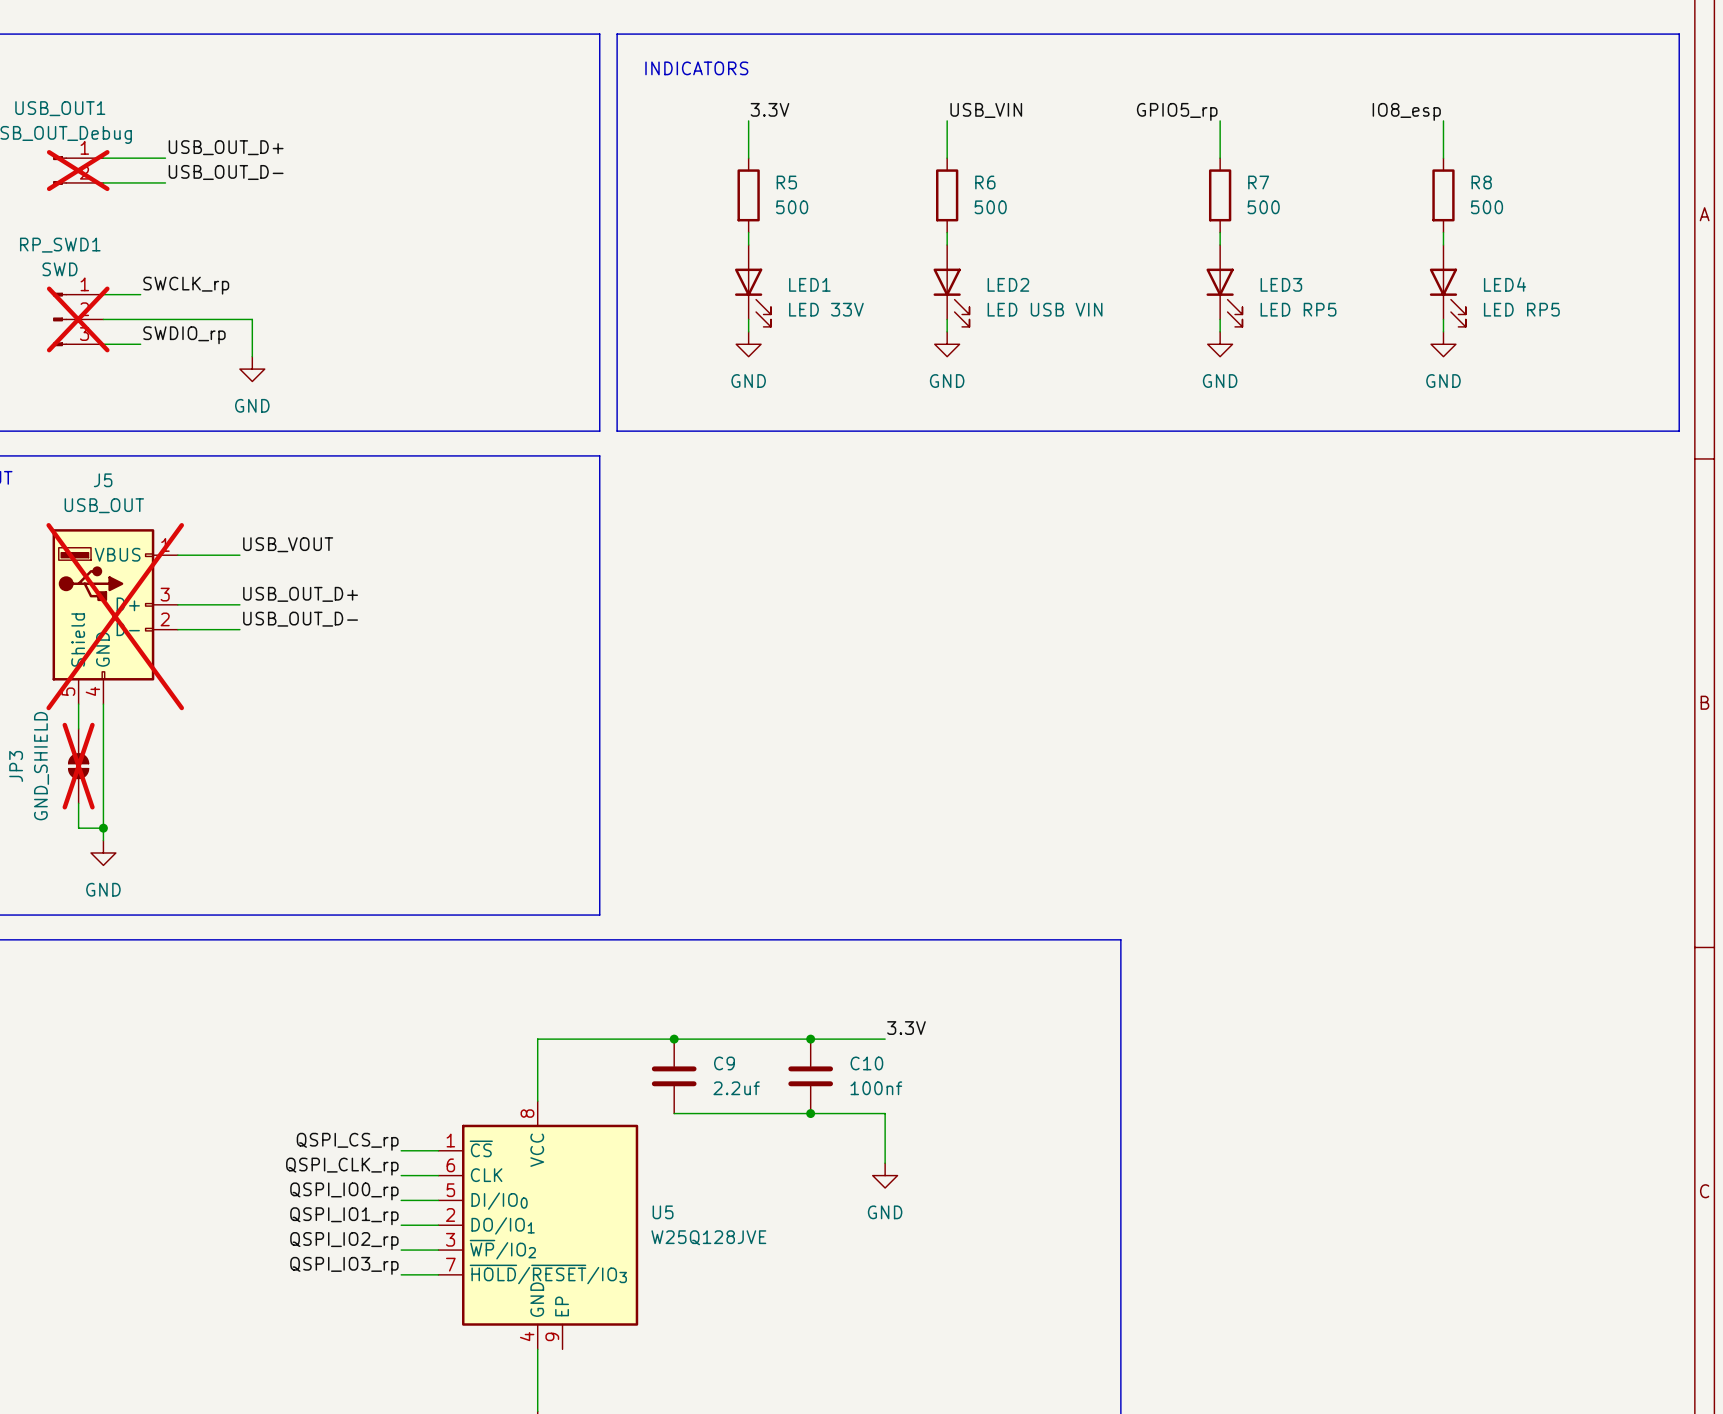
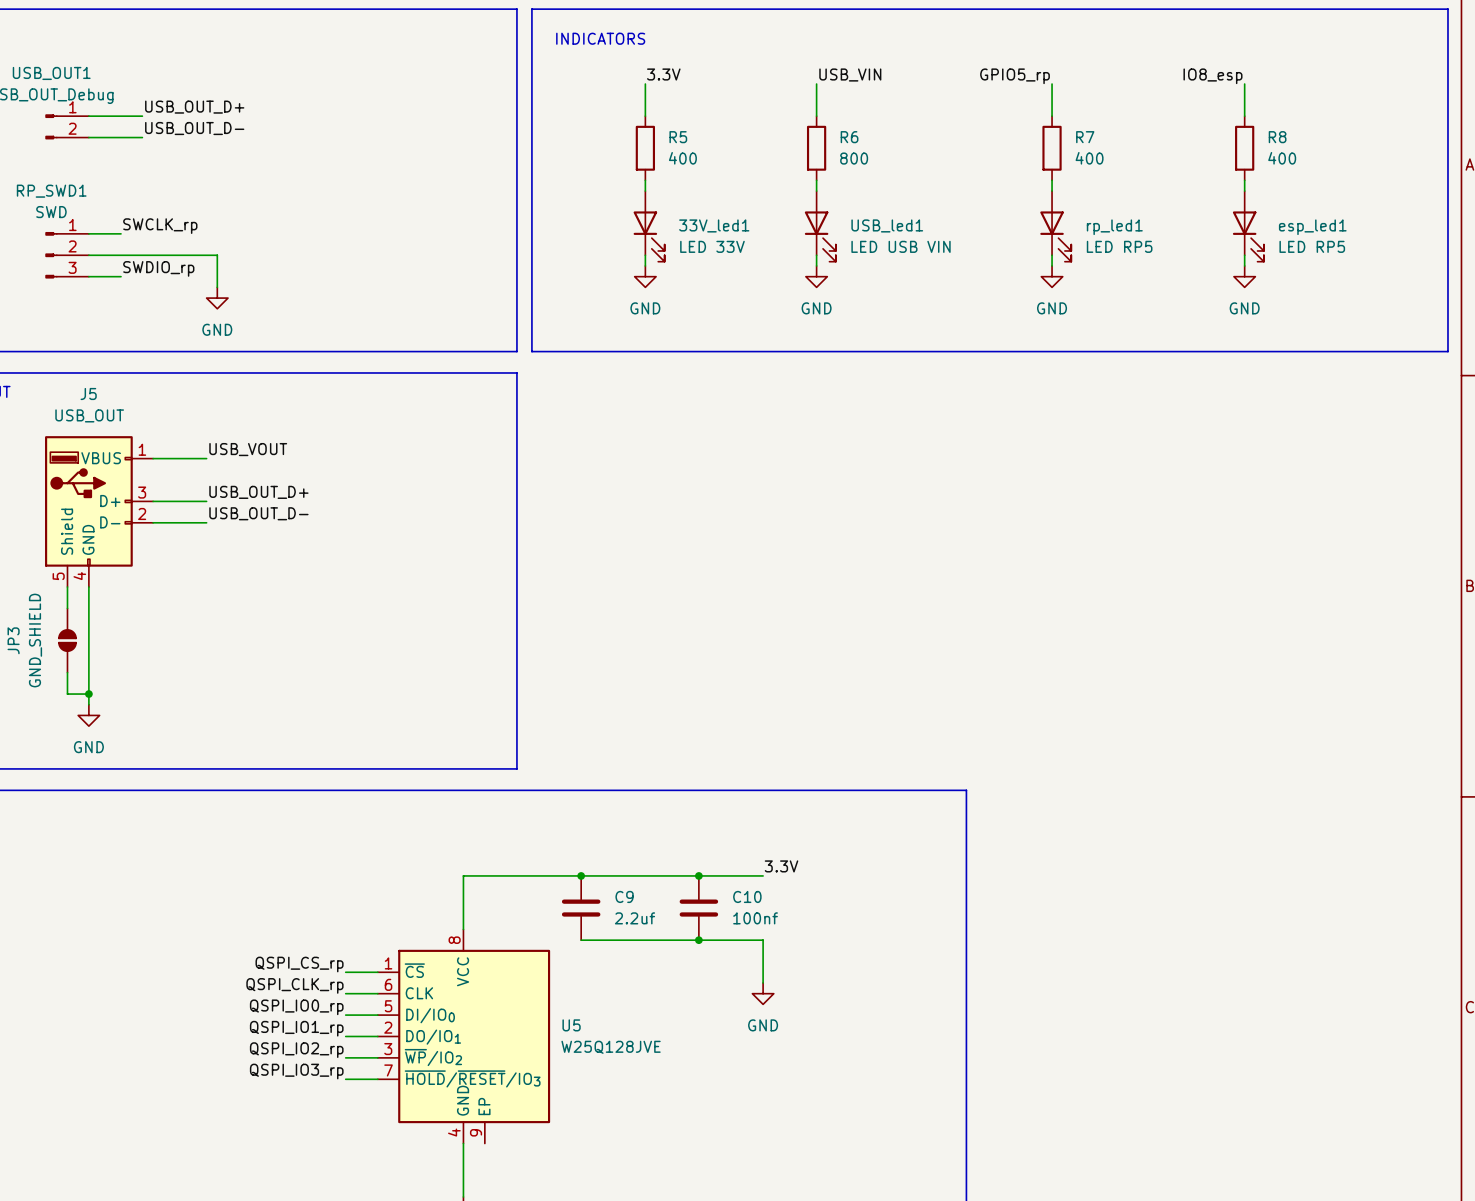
USB_OUT1 do-not-place cross: (78, 170) -> none
R5 value: 500 (792, 207) -> 400 (682, 158)
R6 value: 500 (990, 207) -> 800 (854, 158)
R7 value: 500 (1263, 207) -> 400 (1089, 158)
R8 value: 500 (1487, 207) -> 400 (1282, 158)
LED1 name: LED1 (809, 284) -> 33V_led1 (714, 225)
LED2 name: LED2 (1008, 284) -> USB_led1 (887, 225)
LED3 name: LED3 (1281, 284) -> rp_led1 (1114, 227)
LED4 name: LED4 (1505, 284) -> esp_led1 (1312, 227)
RP_SWD1 do-not-place cross: (78, 319) -> none
J5 do-not-place cross: (115, 616) -> none
JP3 do-not-place cross: (78, 766) -> none

